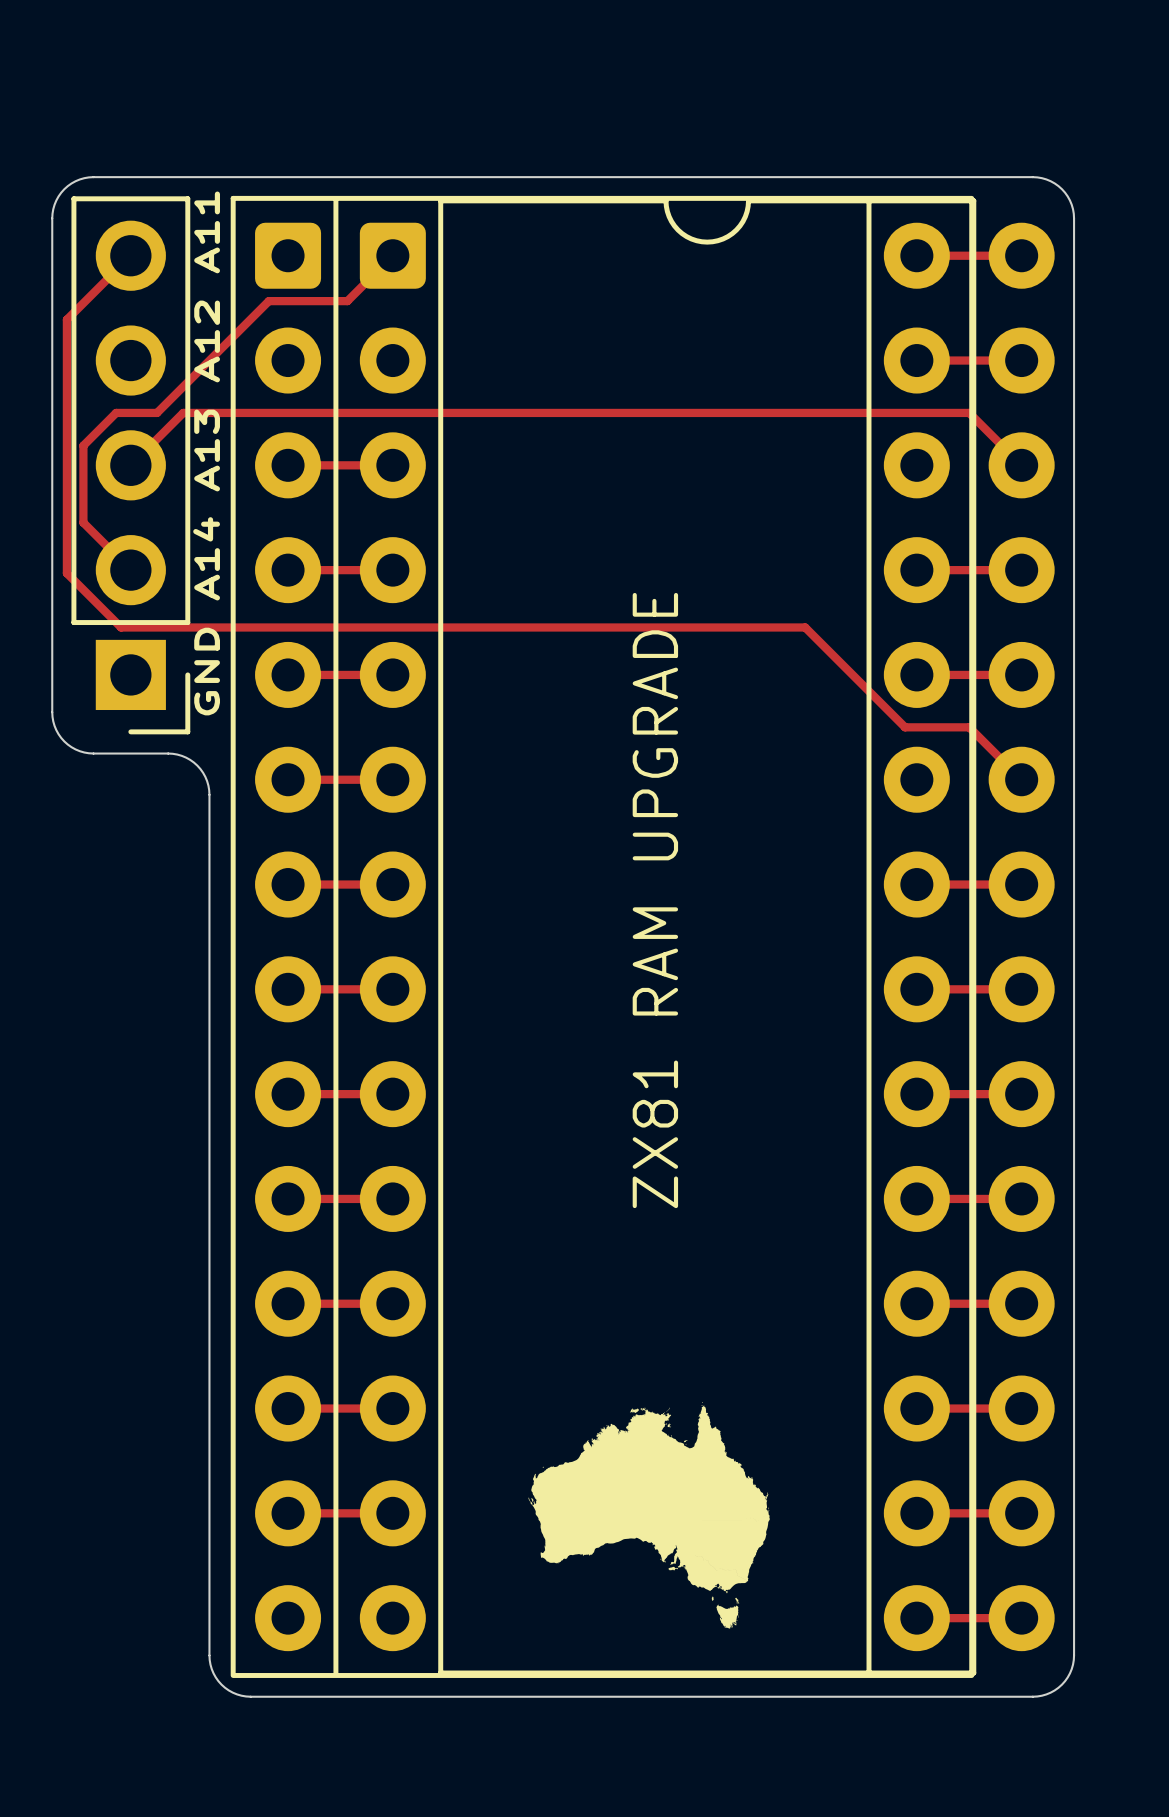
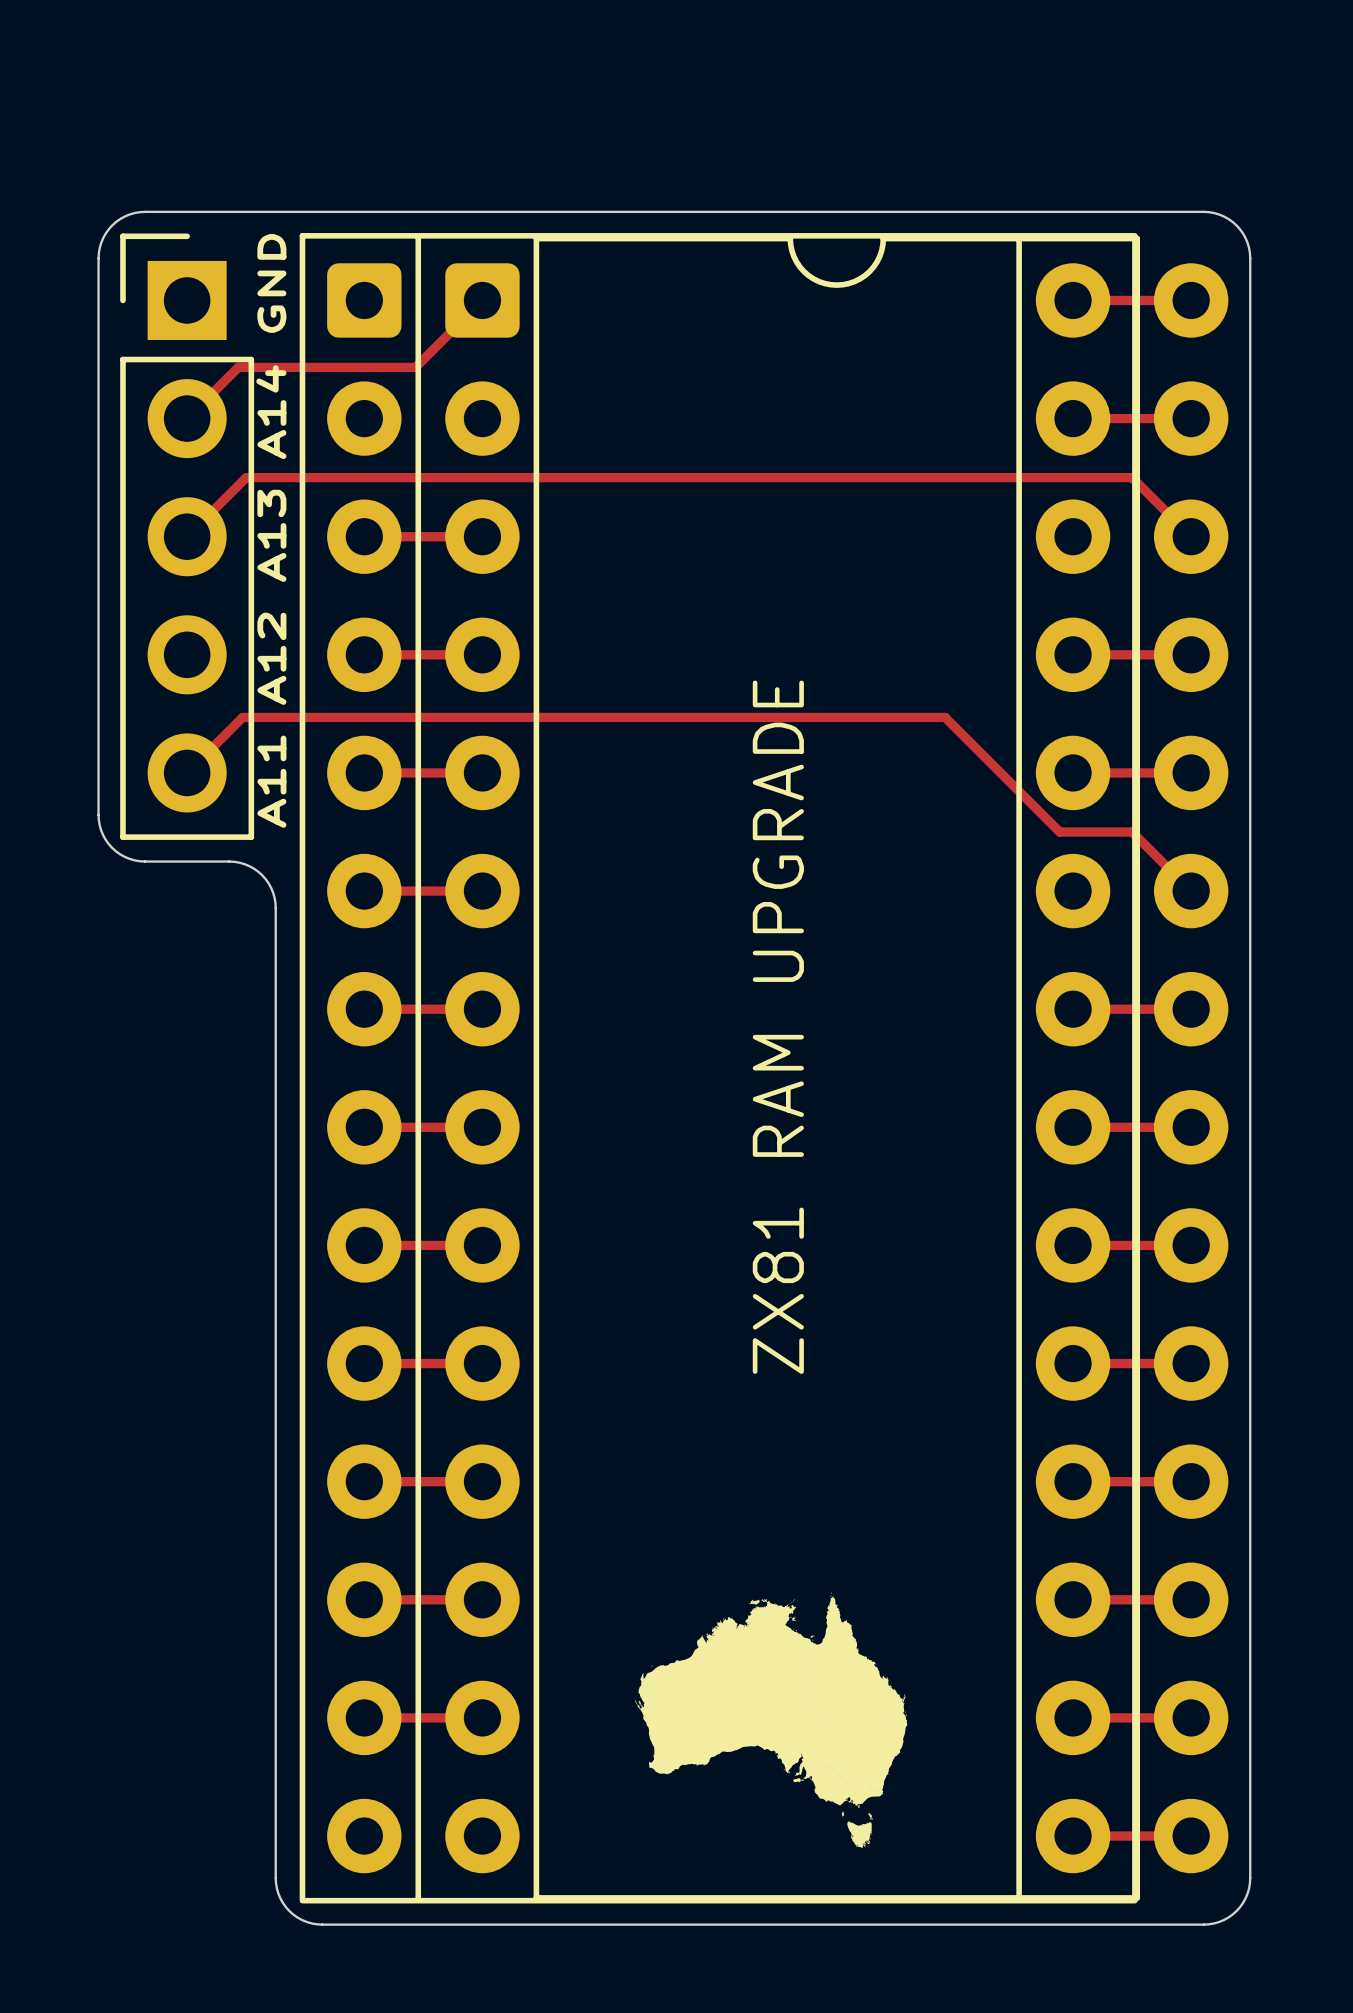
track: (130, 255) (66, 319) (66, 573) (121, 627) (805, 627) -> (187, 772) (242, 717) (945, 717) (947, 719)
track: (347, 301) (268, 301) (157, 412) (116, 412) (83, 445) (83, 522) (130, 570) -> (431, 351) (415, 367) (238, 367) (187, 418)
text: GND A14 A13 A12 A11 (206, 453) -> A11 A12 A13 A14 GND (271, 530)
part rotation: 0° (130, 465) -> 180° (187, 536)

